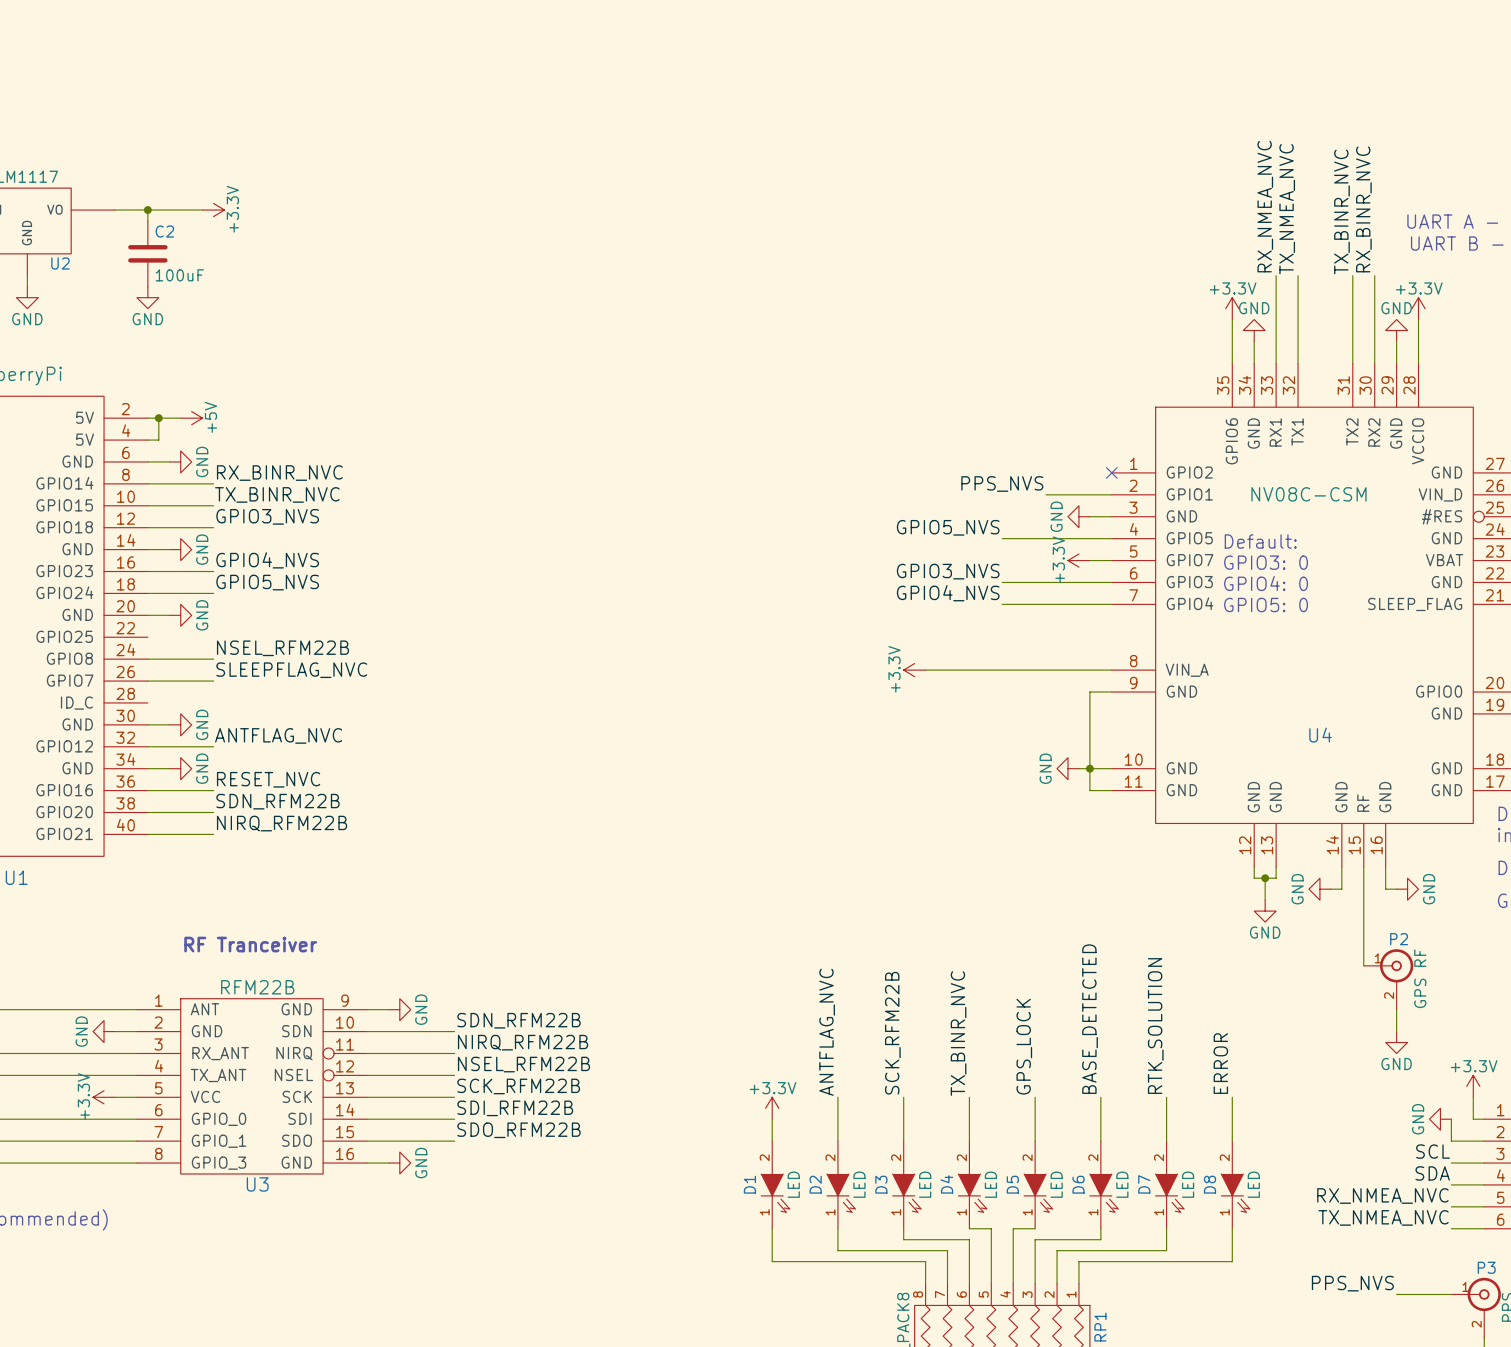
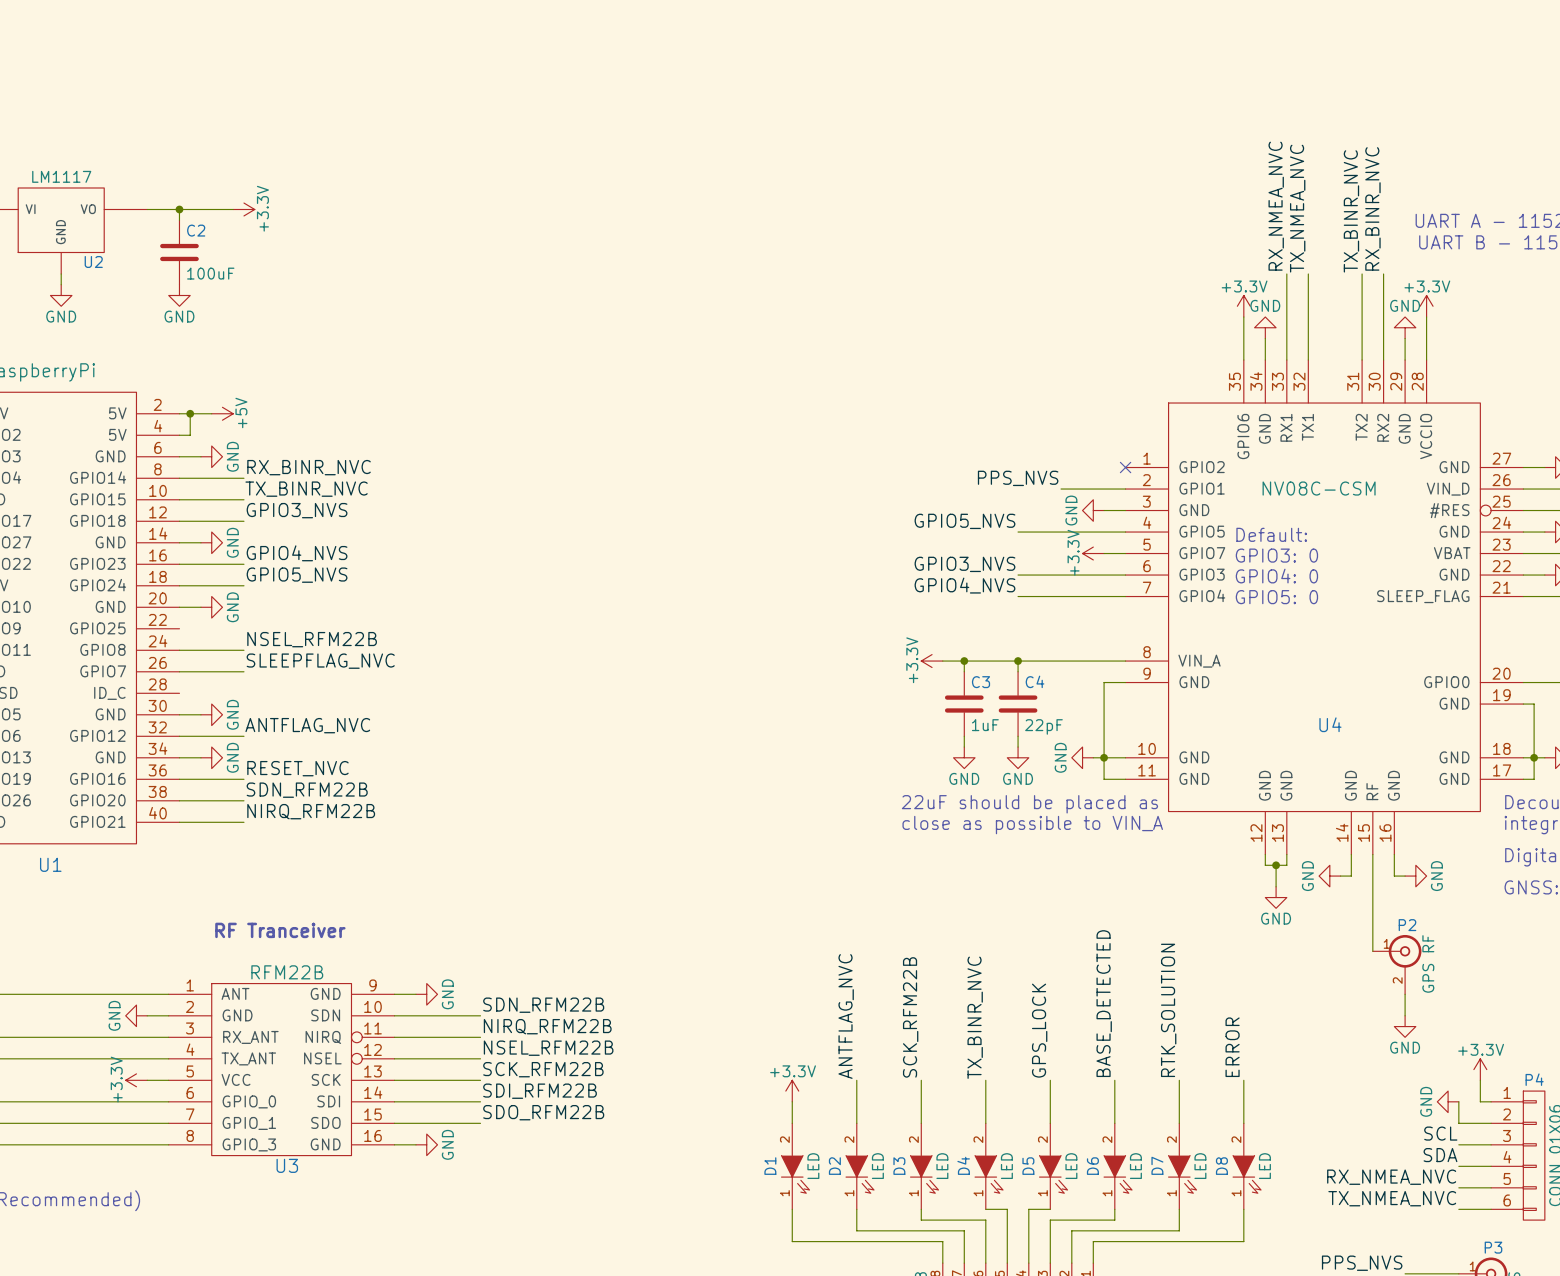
wire: none -> (964, 661) (964, 671)
junction: none -> (964, 661)
wire: none -> (1018, 661) (1018, 671)
junction: none -> (1018, 661)
C3: none -> 1uF (964, 704)
C4: none -> 22pF (1018, 704)
wire: none -> (964, 736) (964, 747)
wire: none -> (1018, 736) (1018, 747)
power symbol: none -> GND (964, 757)
power symbol: none -> GND (1018, 757)
text: none -> 22uF should be placed as (1029, 804)
text: none -> close as possible to VIN_A (1032, 825)

